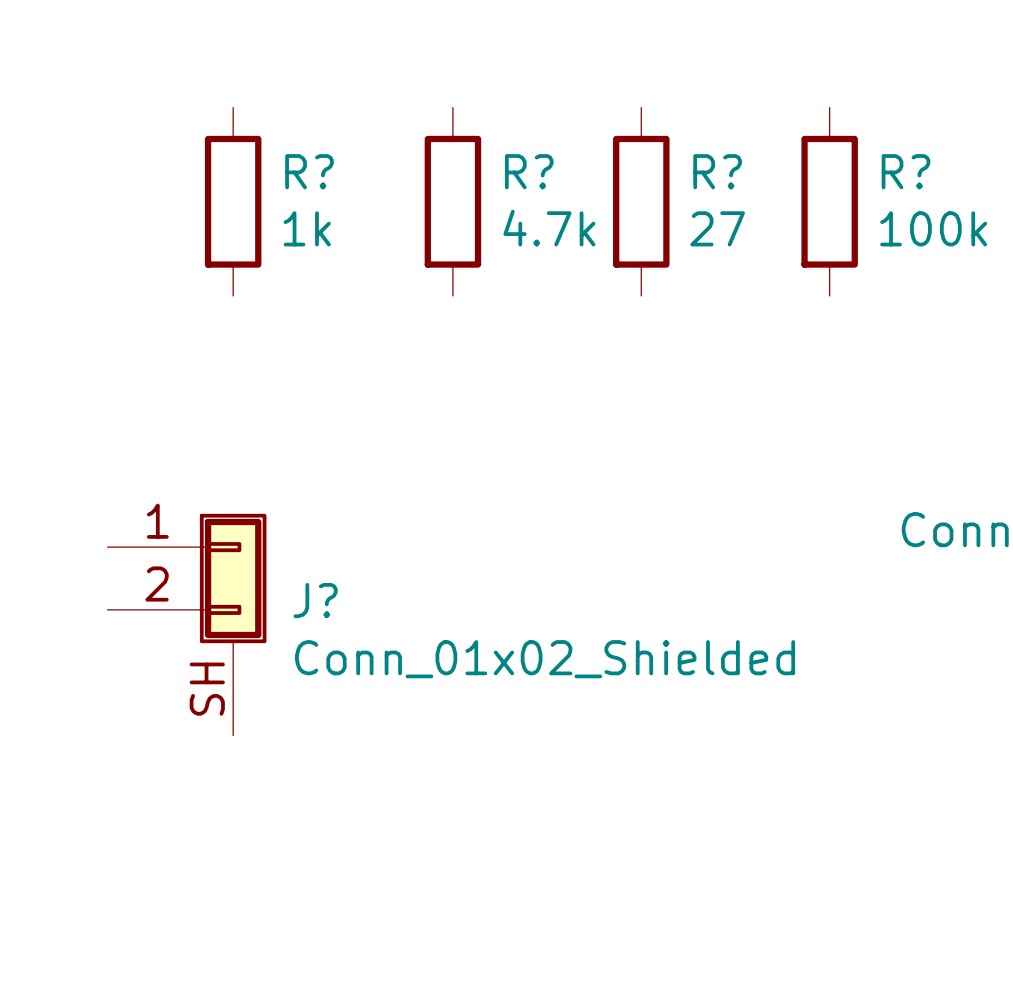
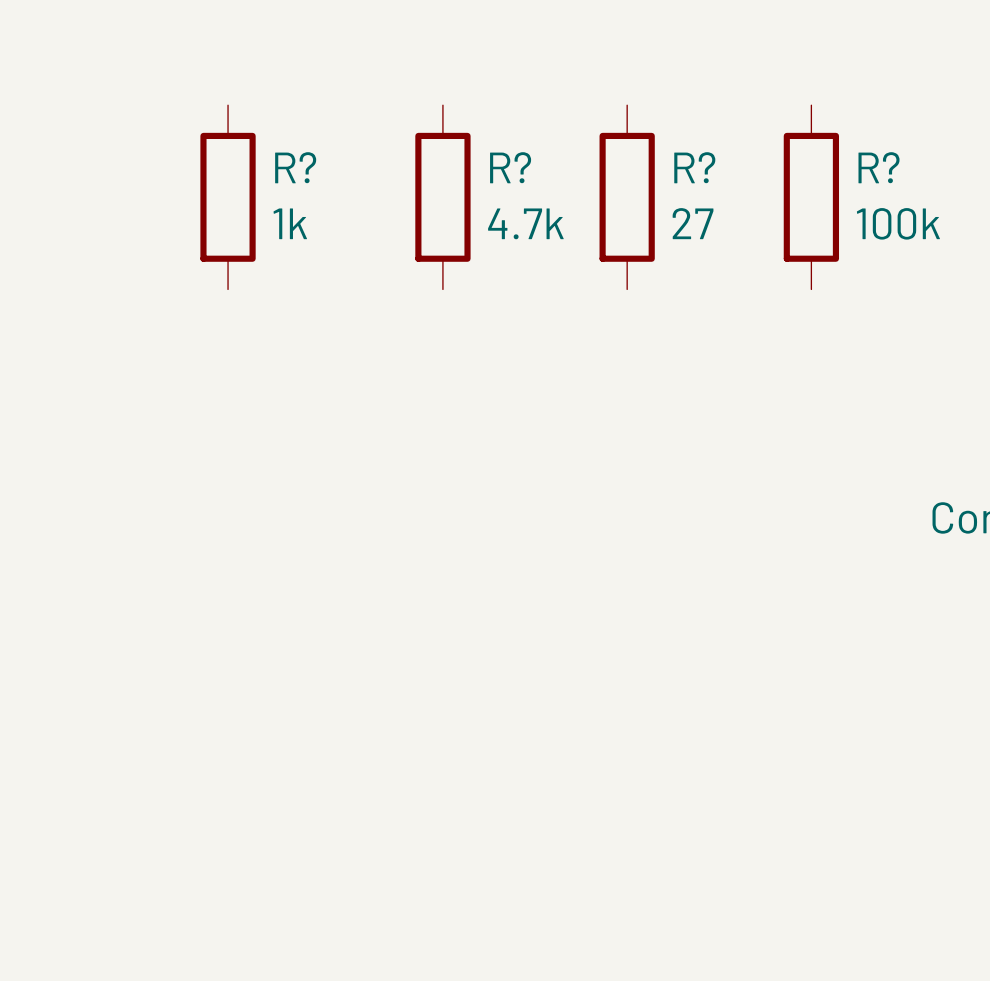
J?: Conn_01x02_Shielded (187, 624) -> none

